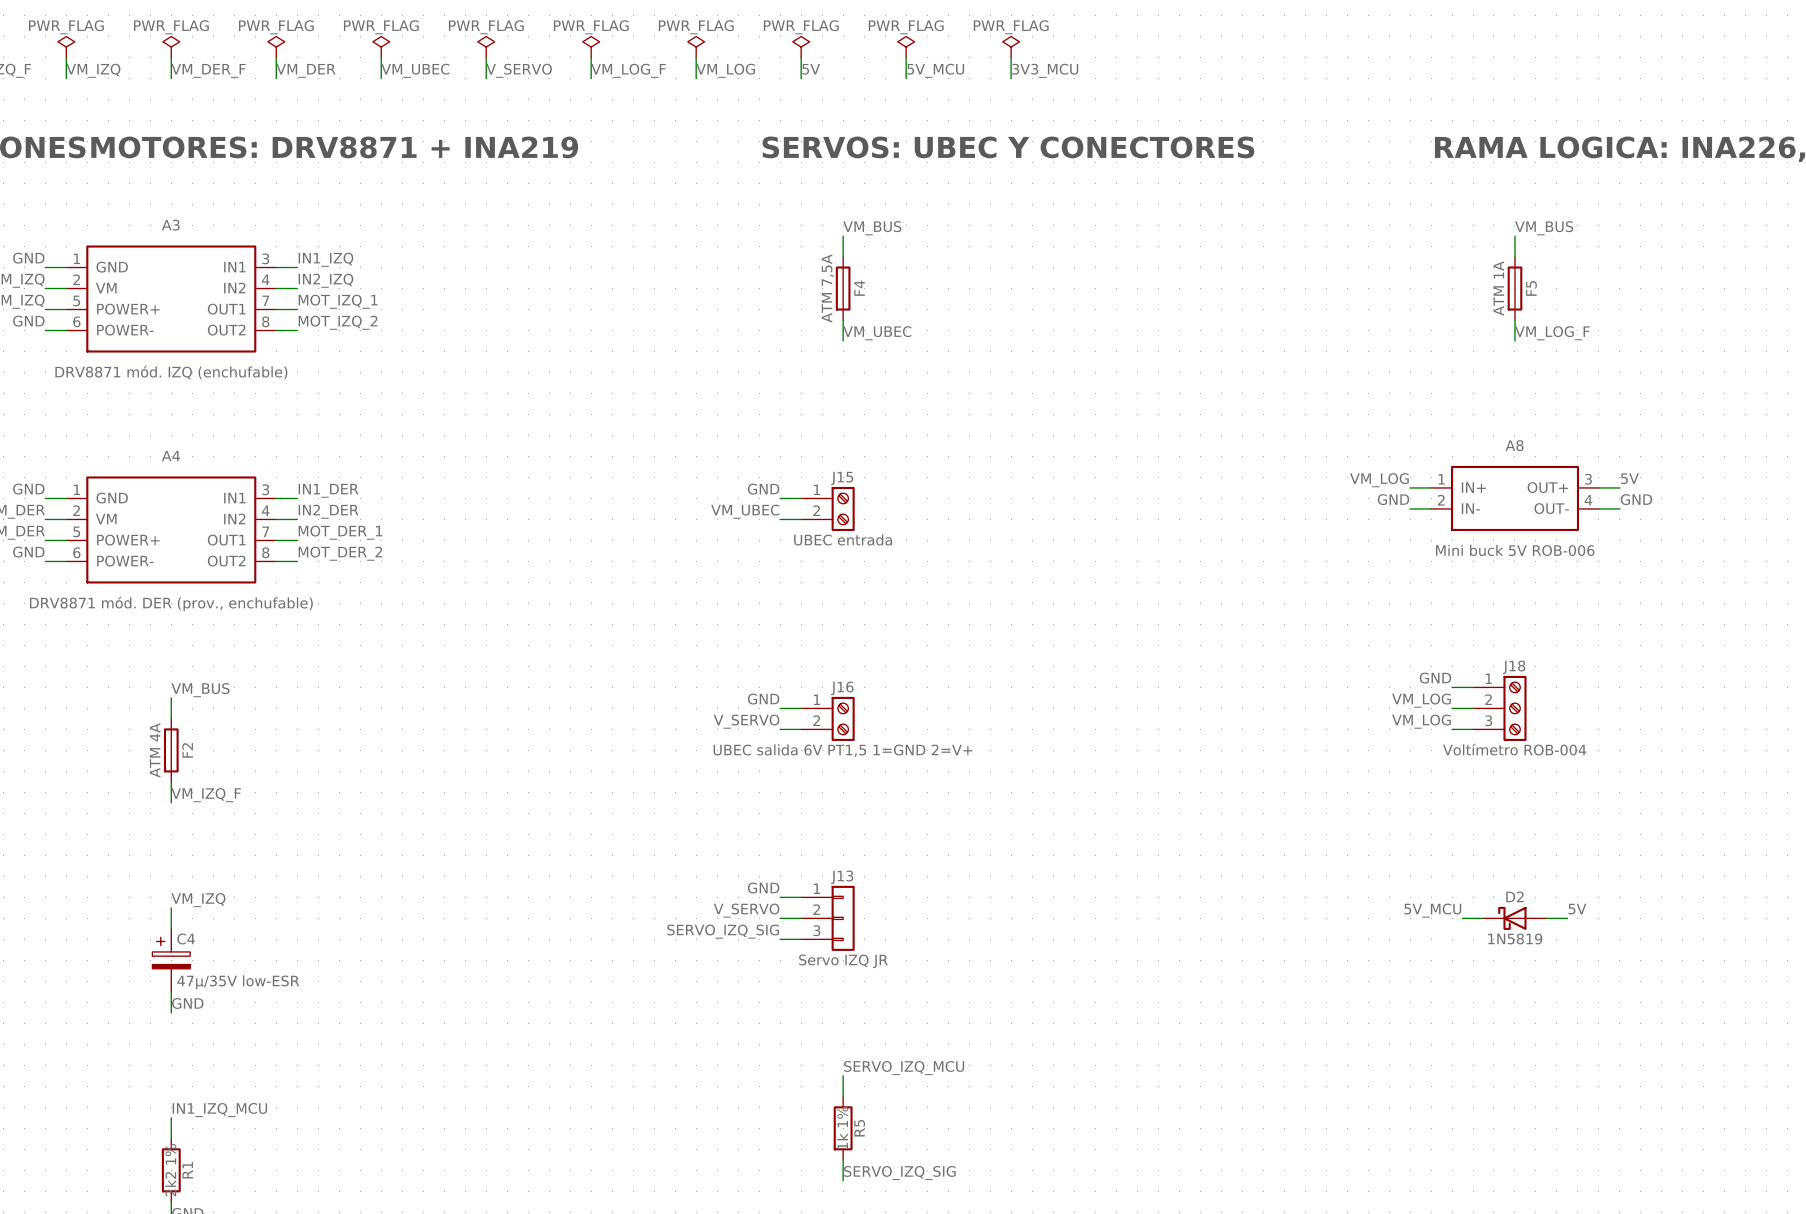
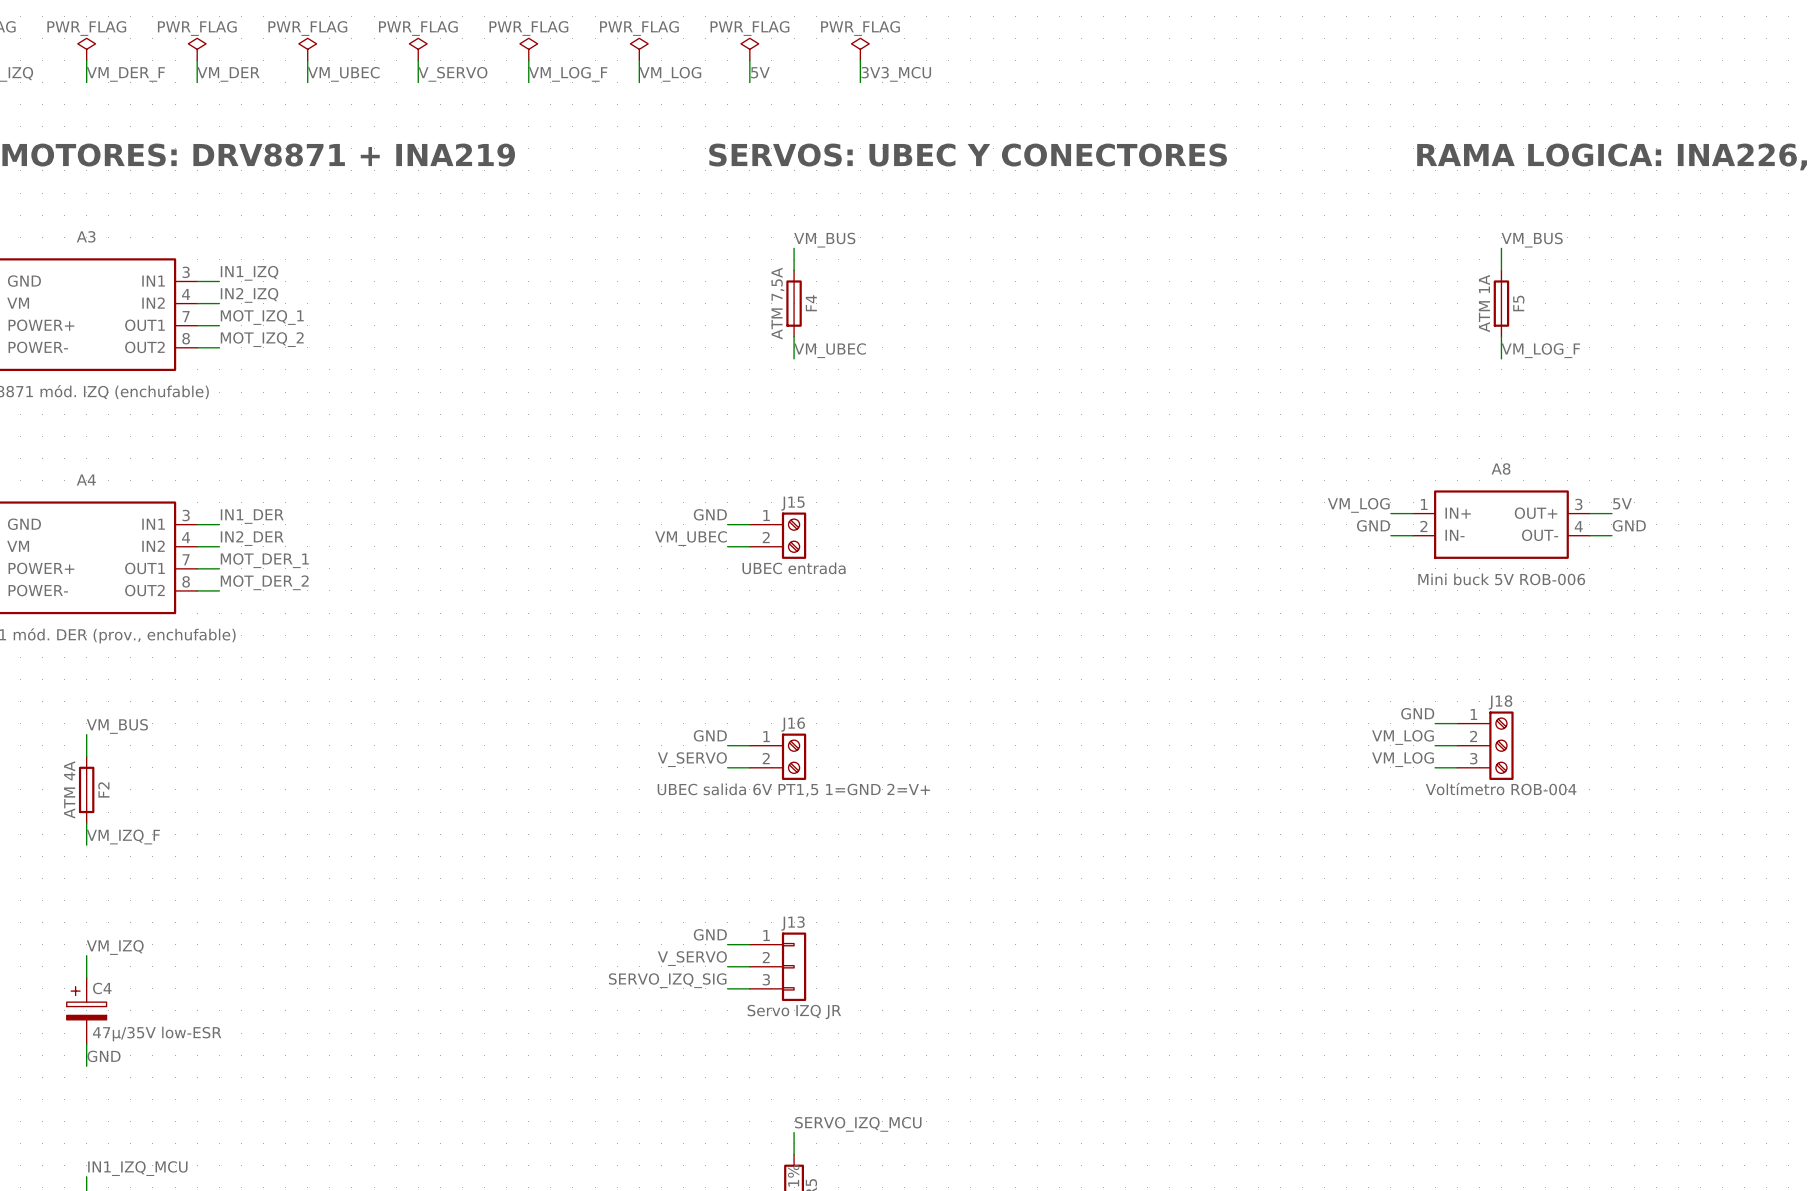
power symbol: PWR_FLAG (1011, 47) -> none
wire: (1011, 57) (1011, 78) -> none
label: 5V_MCU (935, 70) -> 3V3_MCU (896, 74)
label: 3V3_MCU (1045, 70) -> none
label: 5V (1577, 909) -> none
label: 5V_MCU (1432, 910) -> none
wire: (1462, 918) (1483, 918) -> none
D2: 1N5819 (1514, 918) -> none
wire: (1546, 918) (1567, 918) -> none

